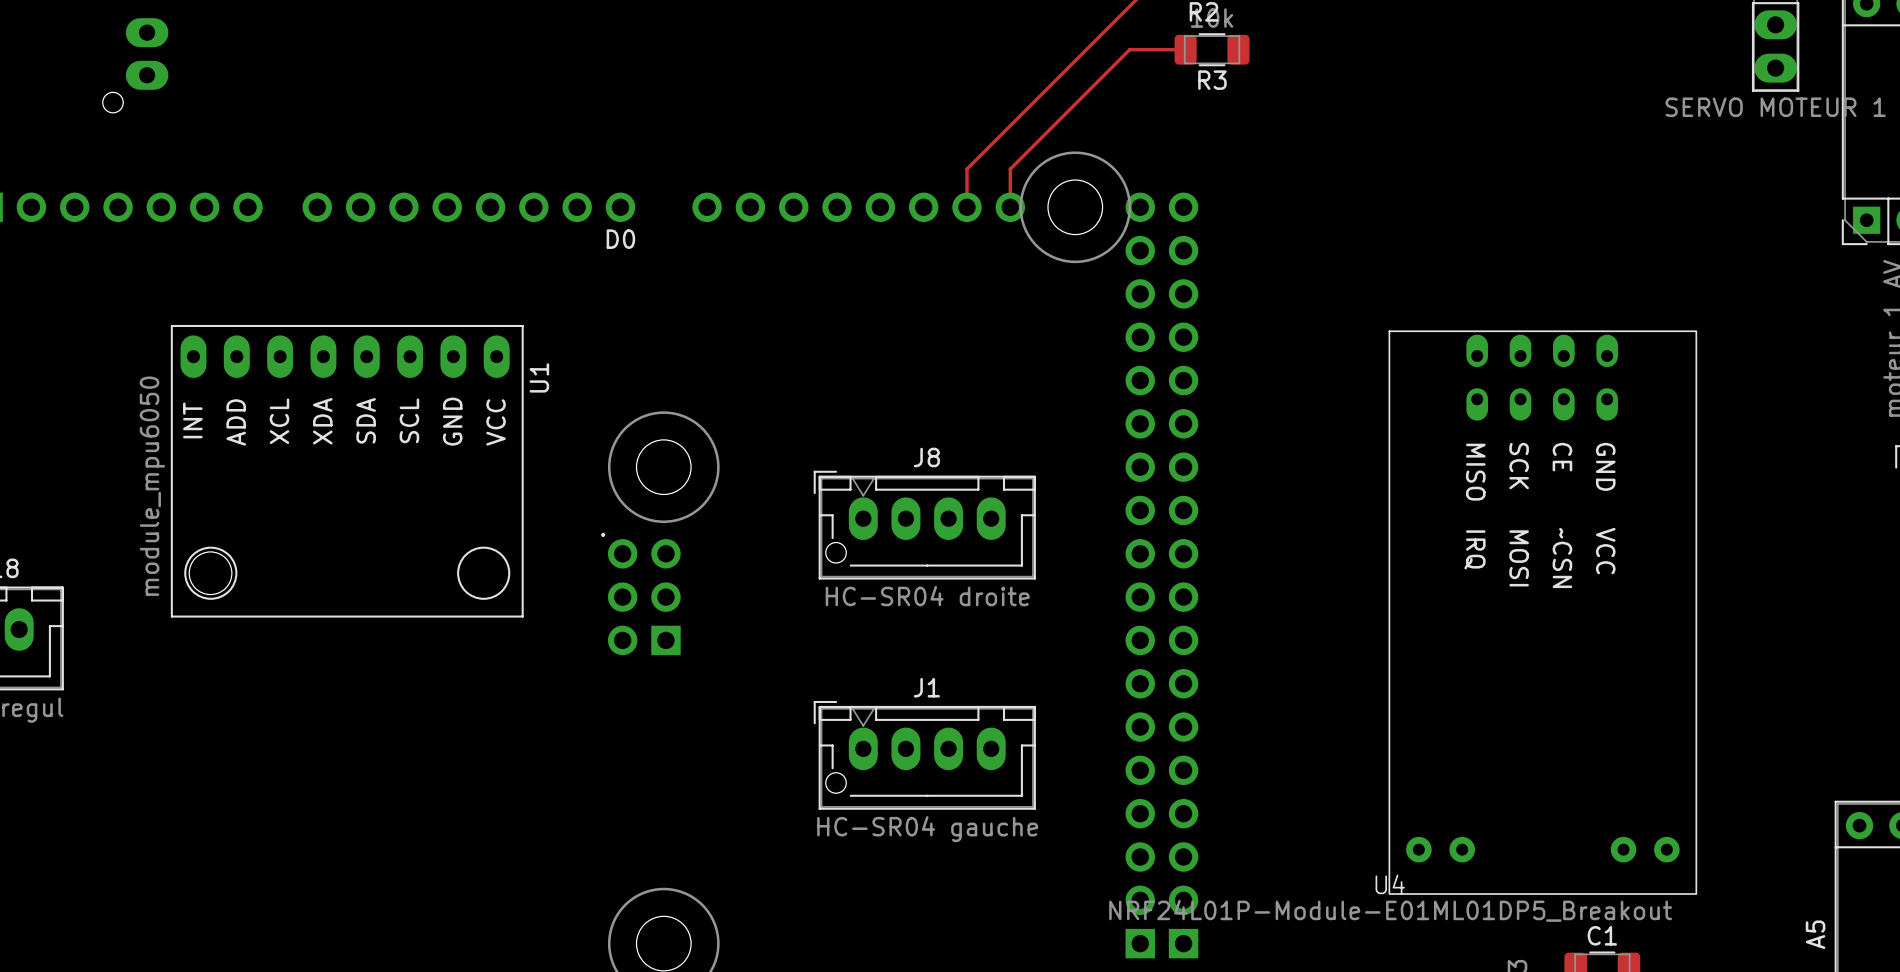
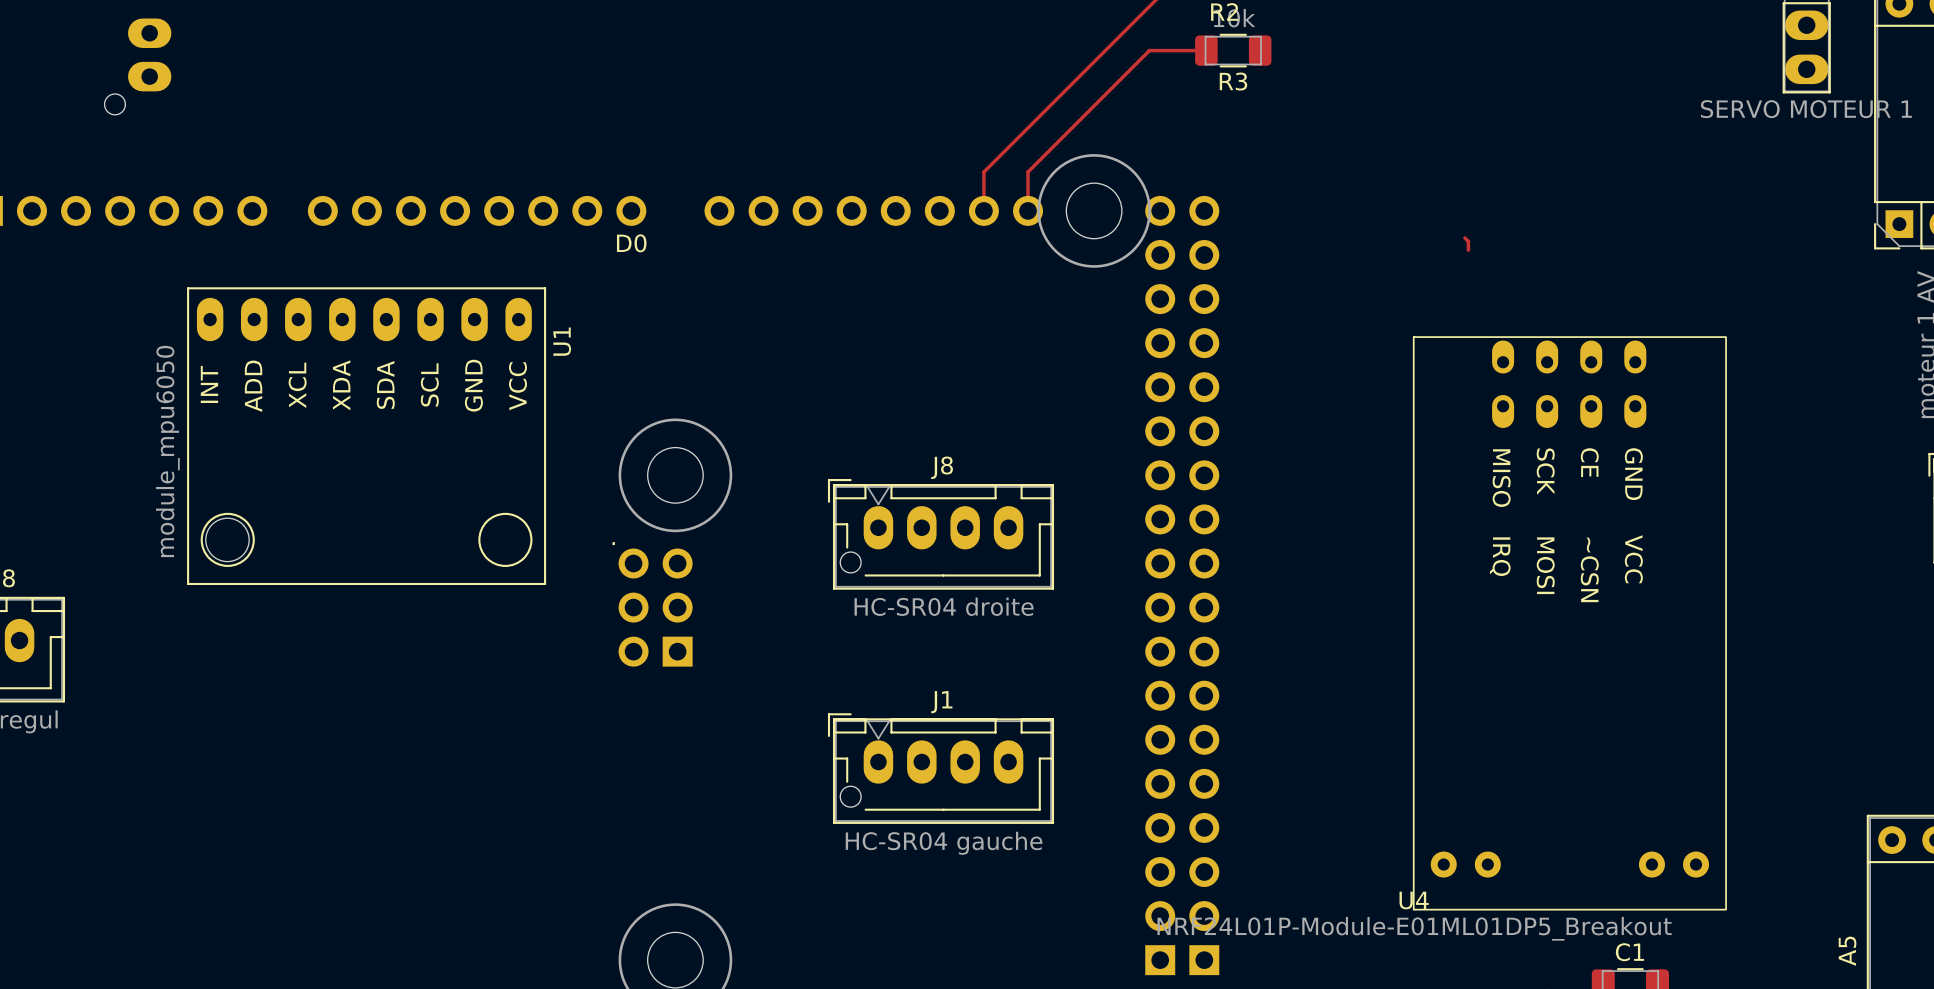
track: none -> (1464, 237) (1468, 241) (1468, 250)
U1 position: (347, 471) -> (366, 436)

